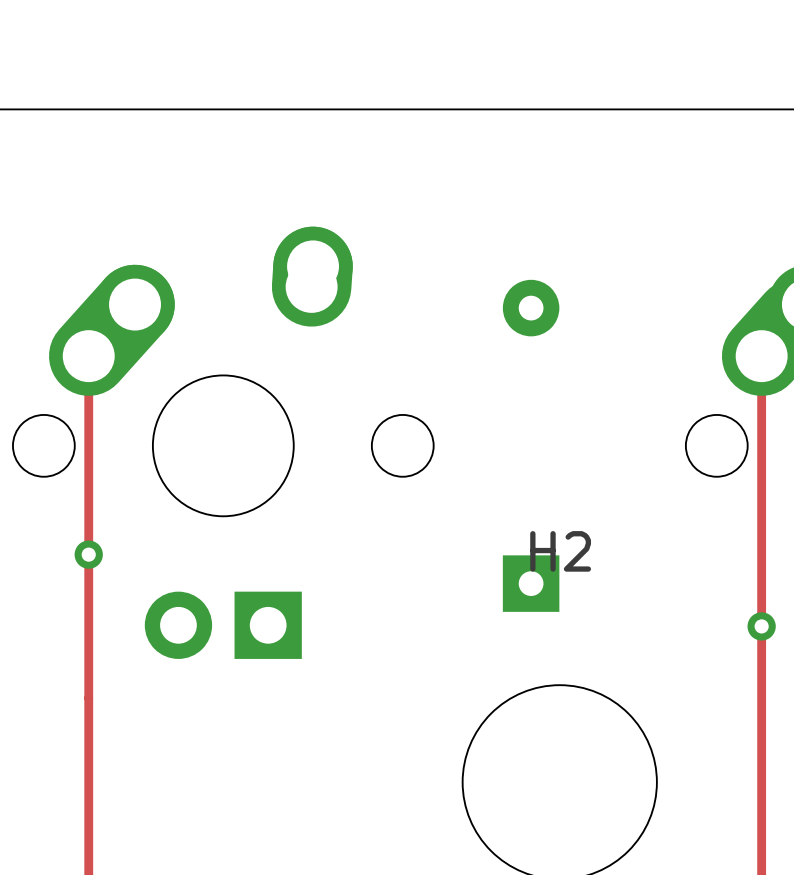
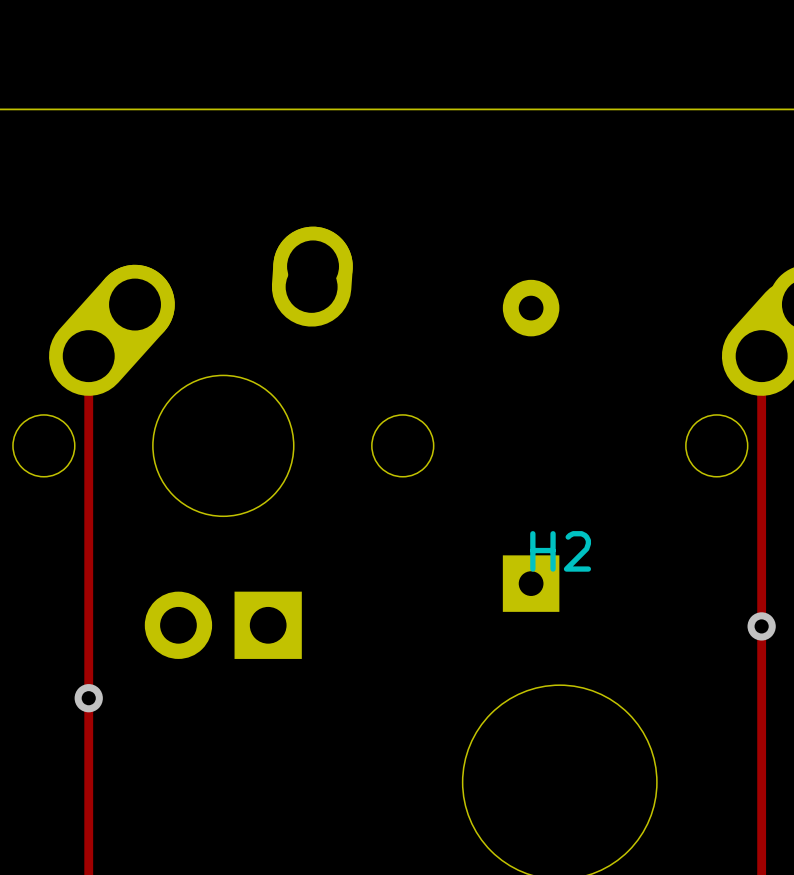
via position: (88, 554) -> (88, 698)

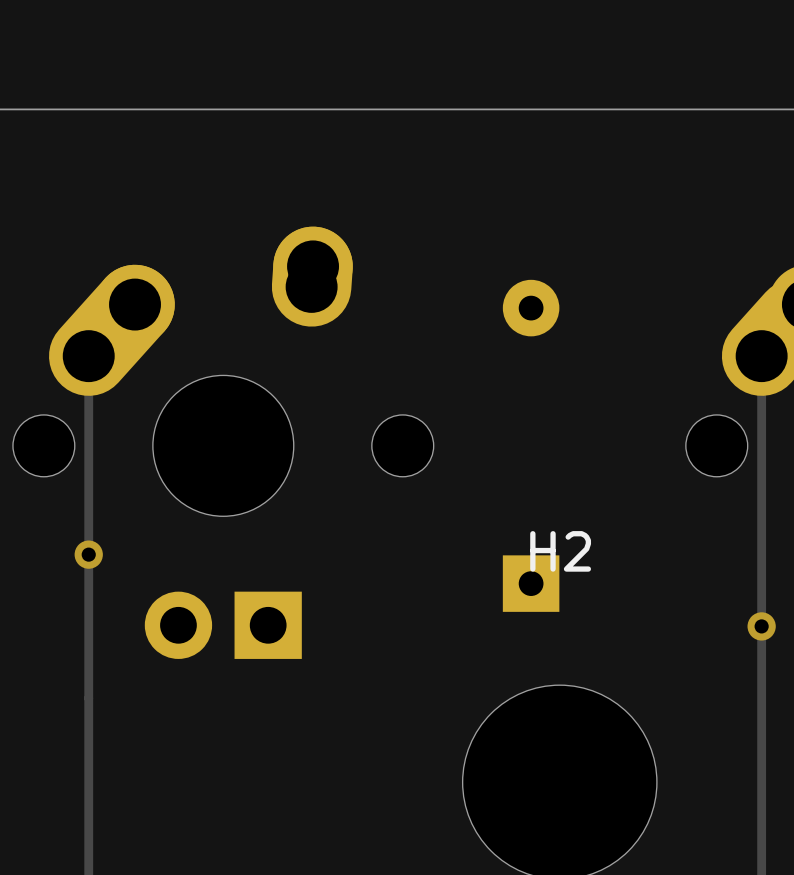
via position: (88, 698) -> (88, 554)

